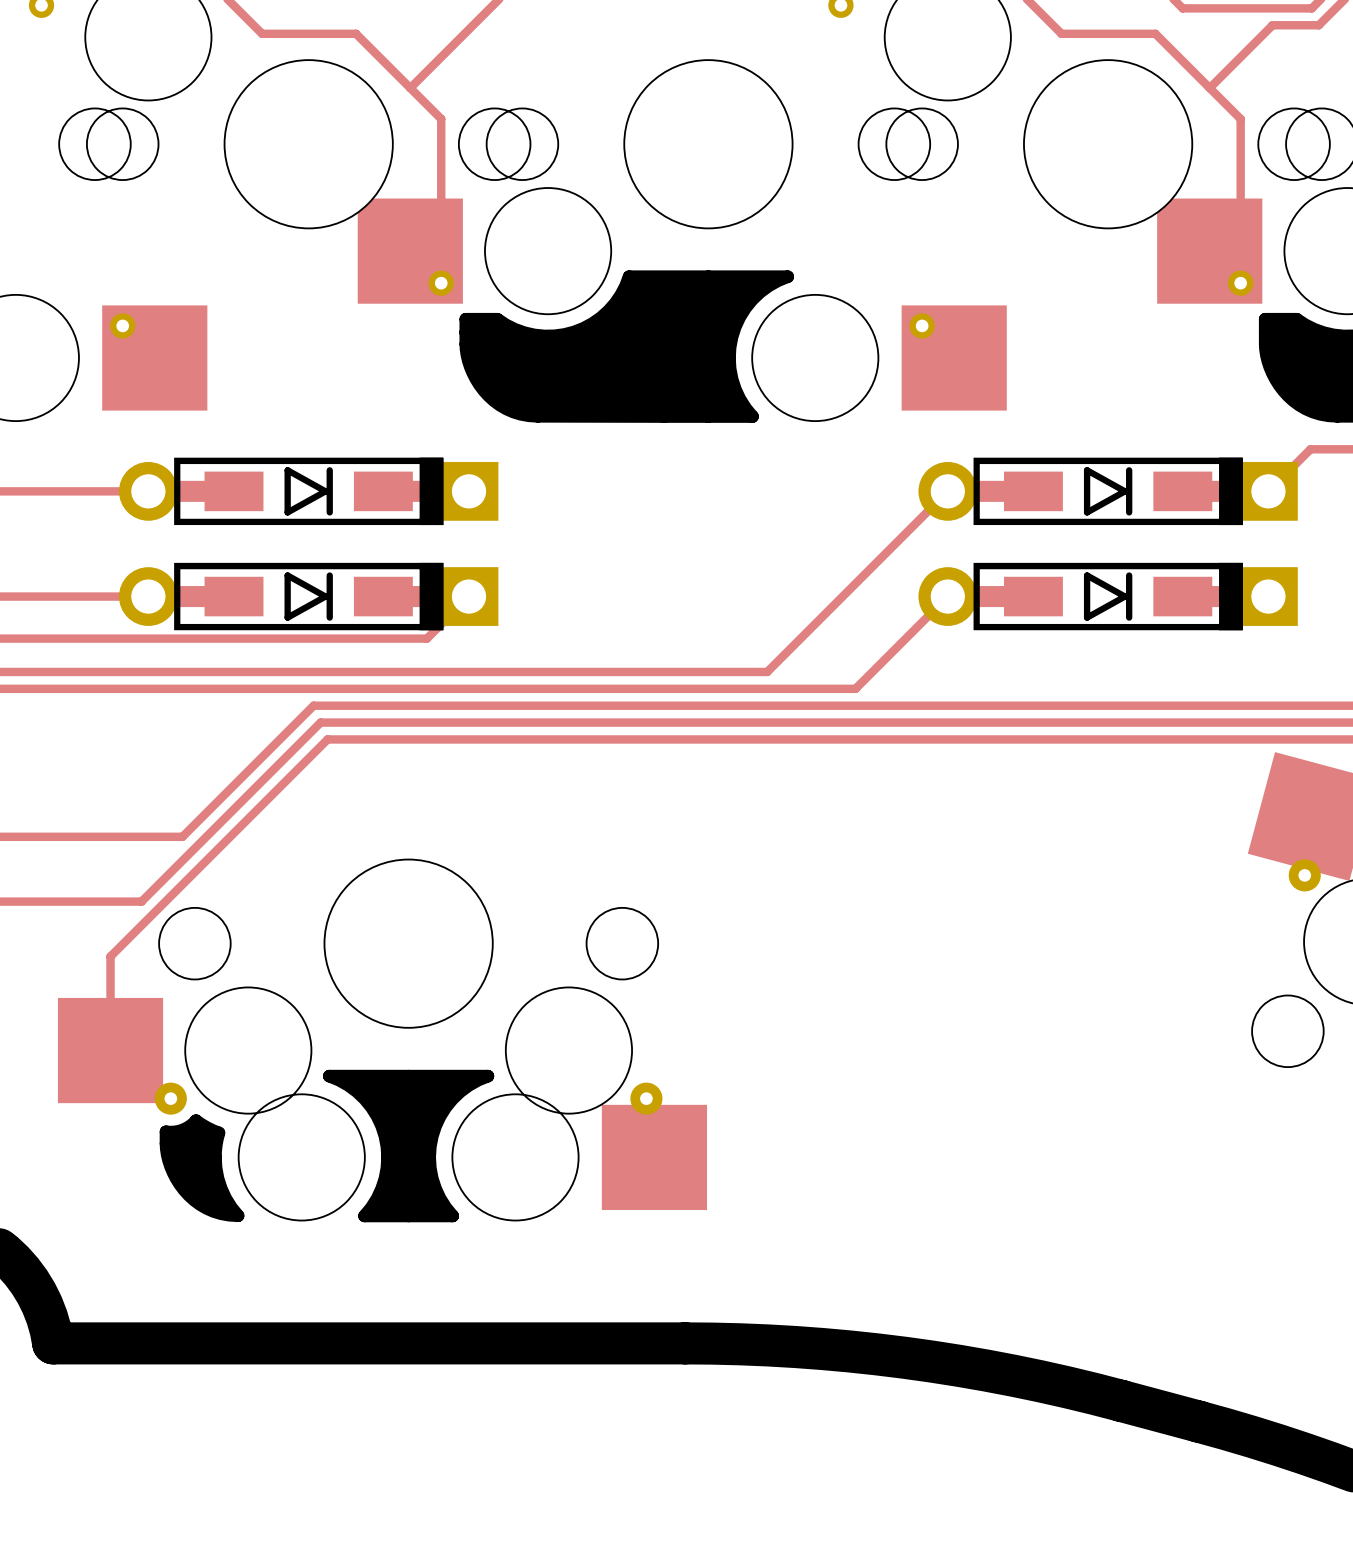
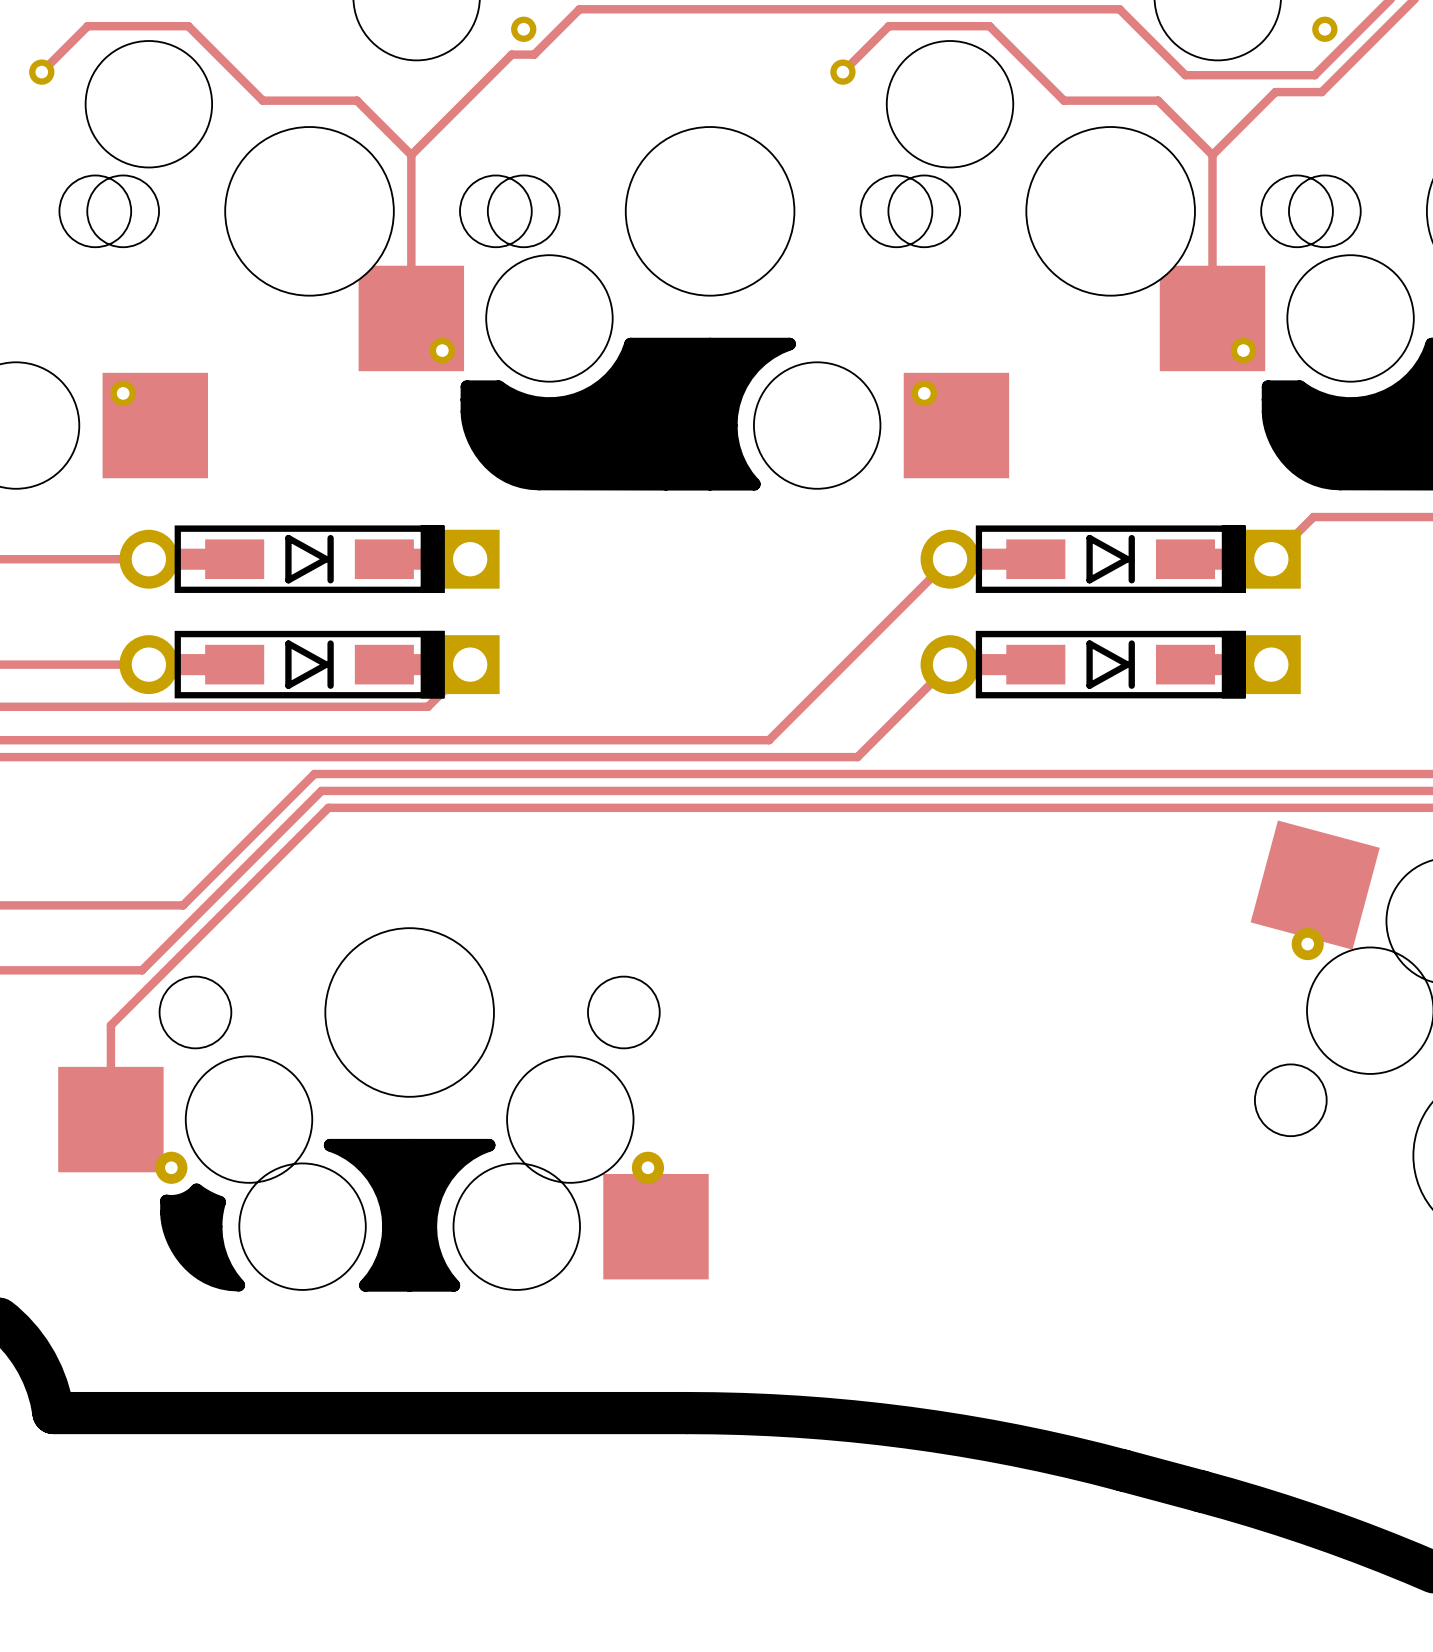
track: (410, 88) (441, 119) (441, 283) -> (411, 155) (411, 318)
track: (1209, 88) (1240, 119) (1240, 283) -> (1212, 155) (1212, 318)

